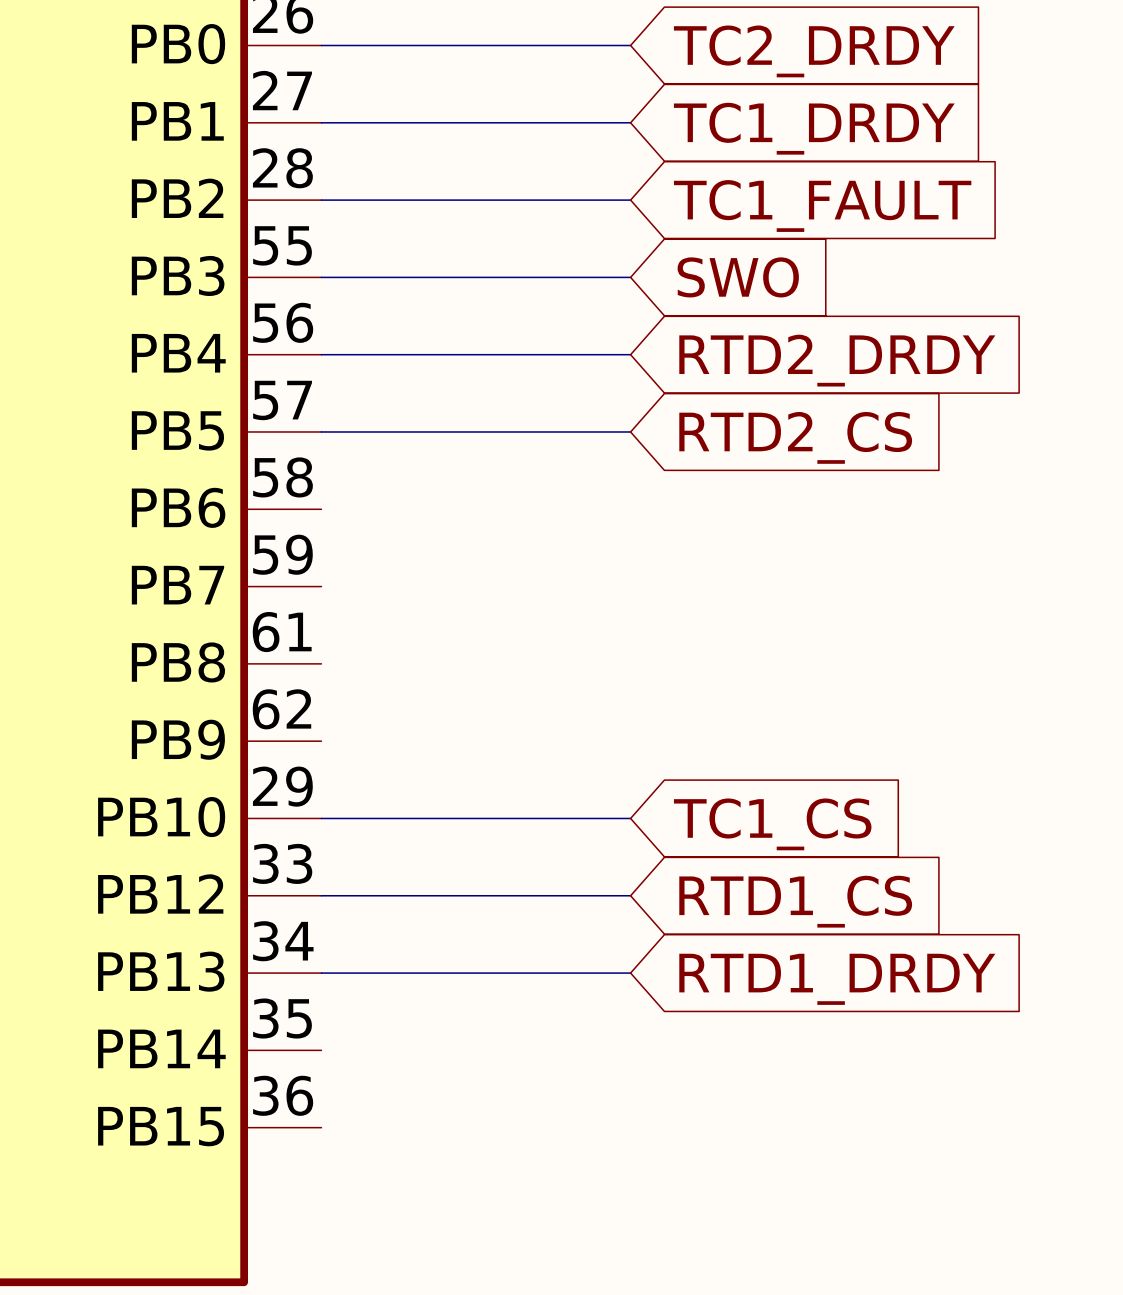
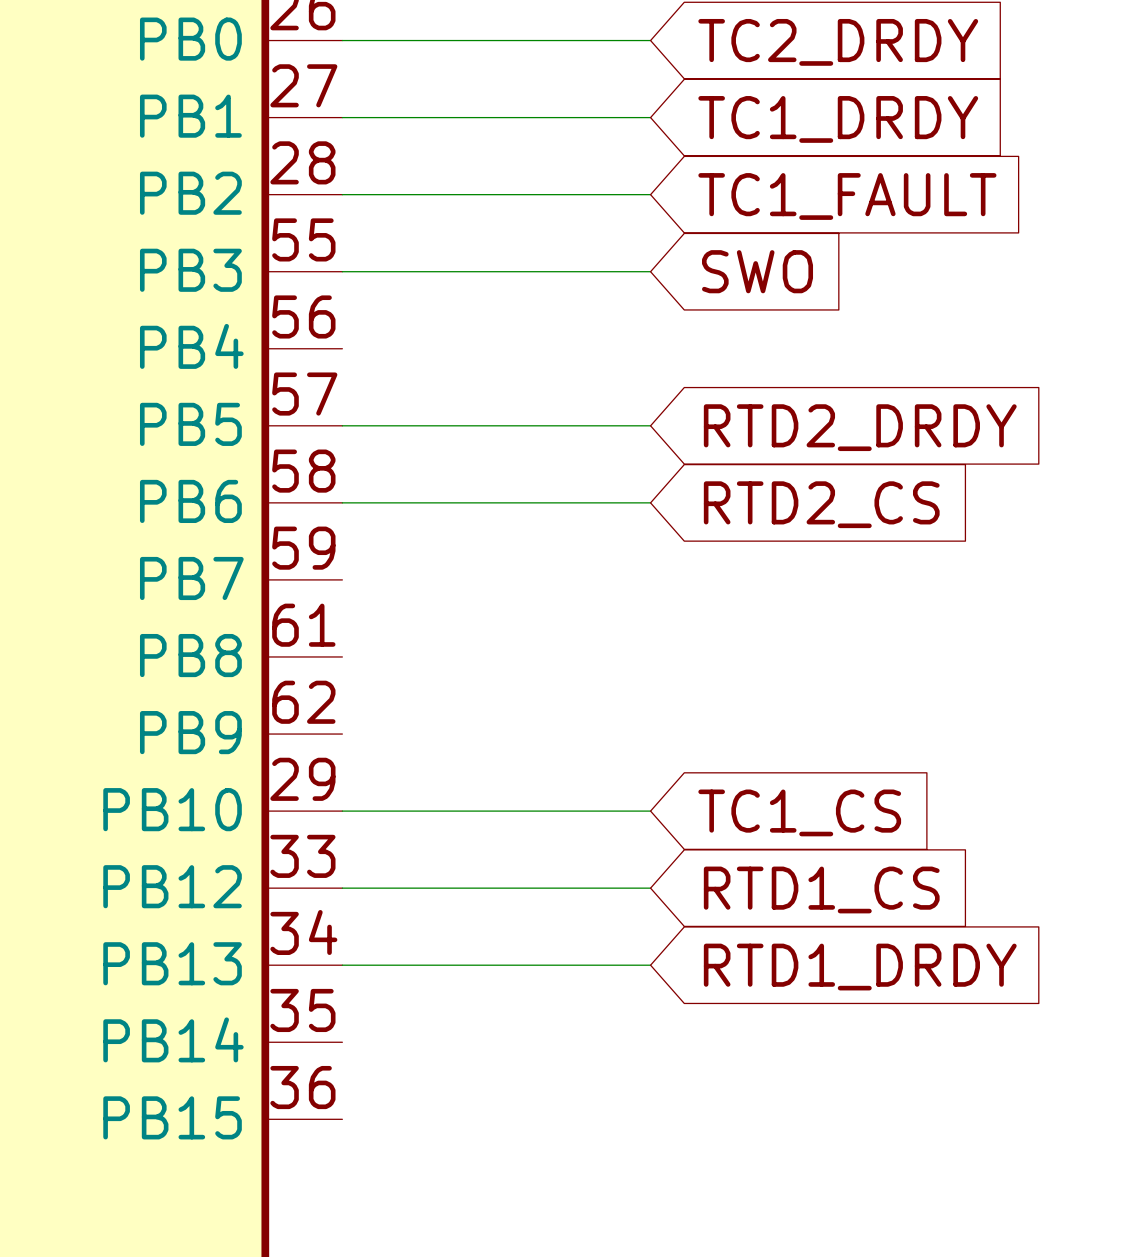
wire: (321, 354) (630, 354) -> (342, 502) (650, 502)
global label: RTD2_DRDY (837, 360) -> none
global label: RTD2_CS (795, 437) -> RTD2_DRDY (860, 427)
global label: none -> RTD2_CS (821, 504)

